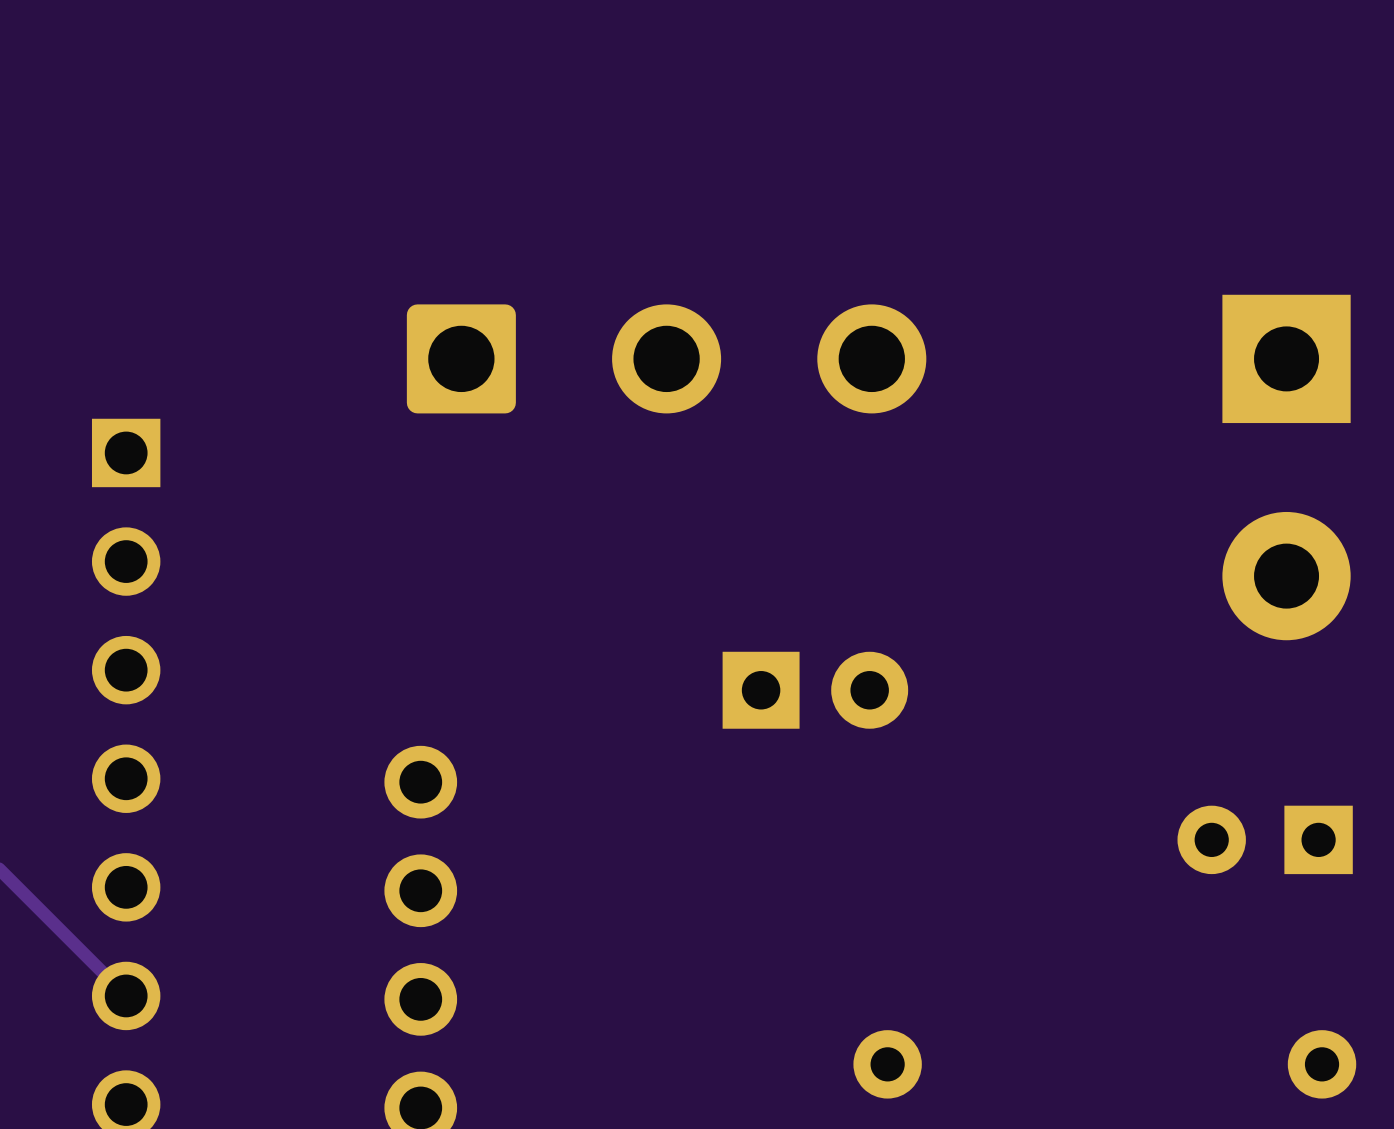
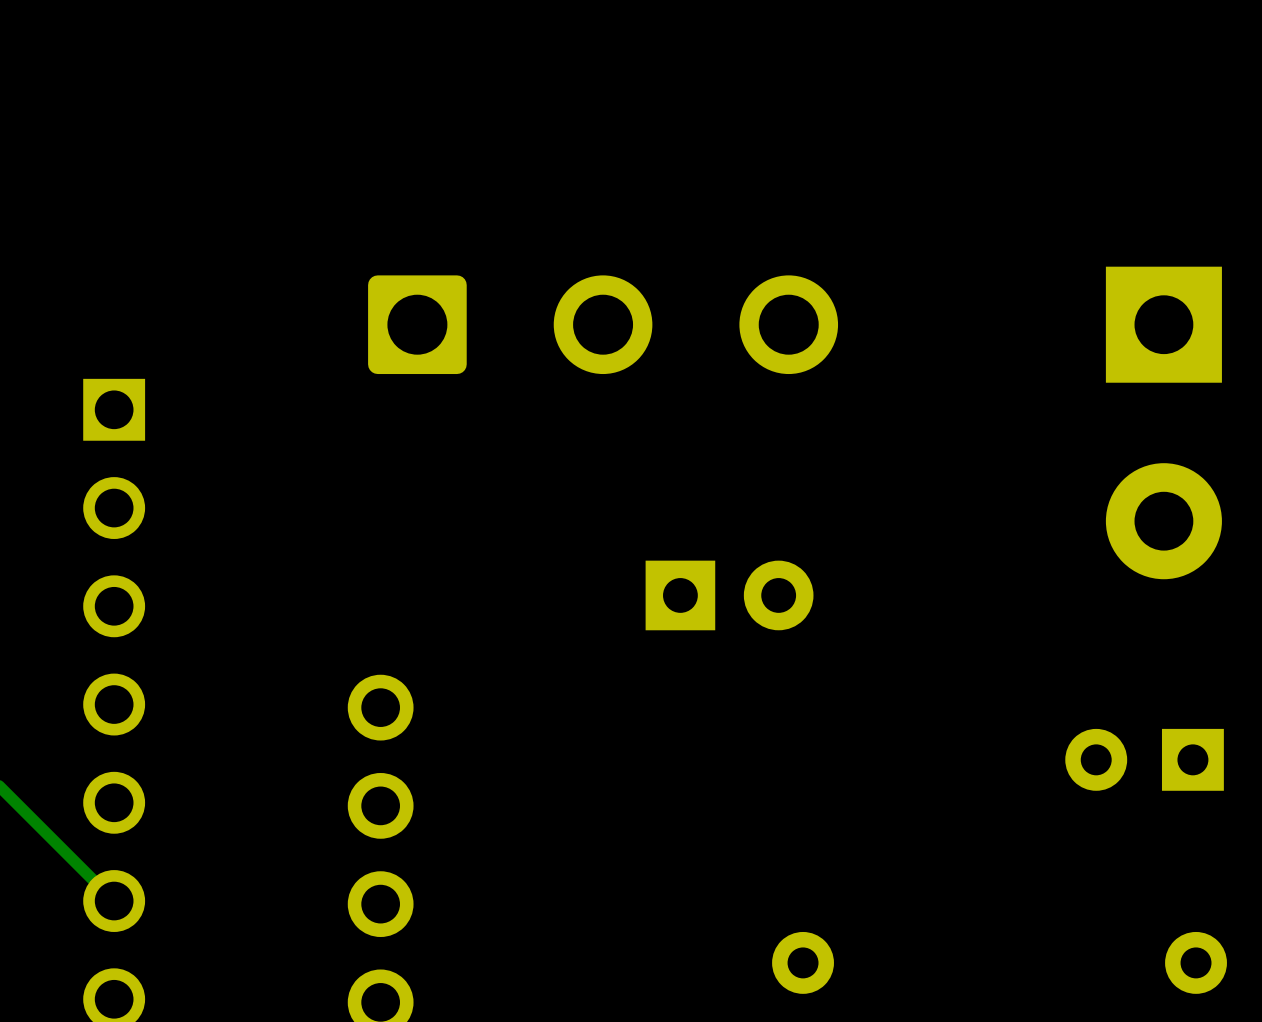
part position: (815, 690) -> (729, 595)

